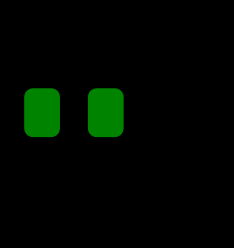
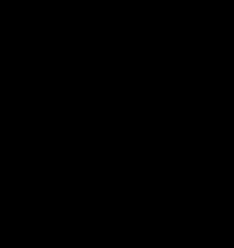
part: (73, 112) -> none

